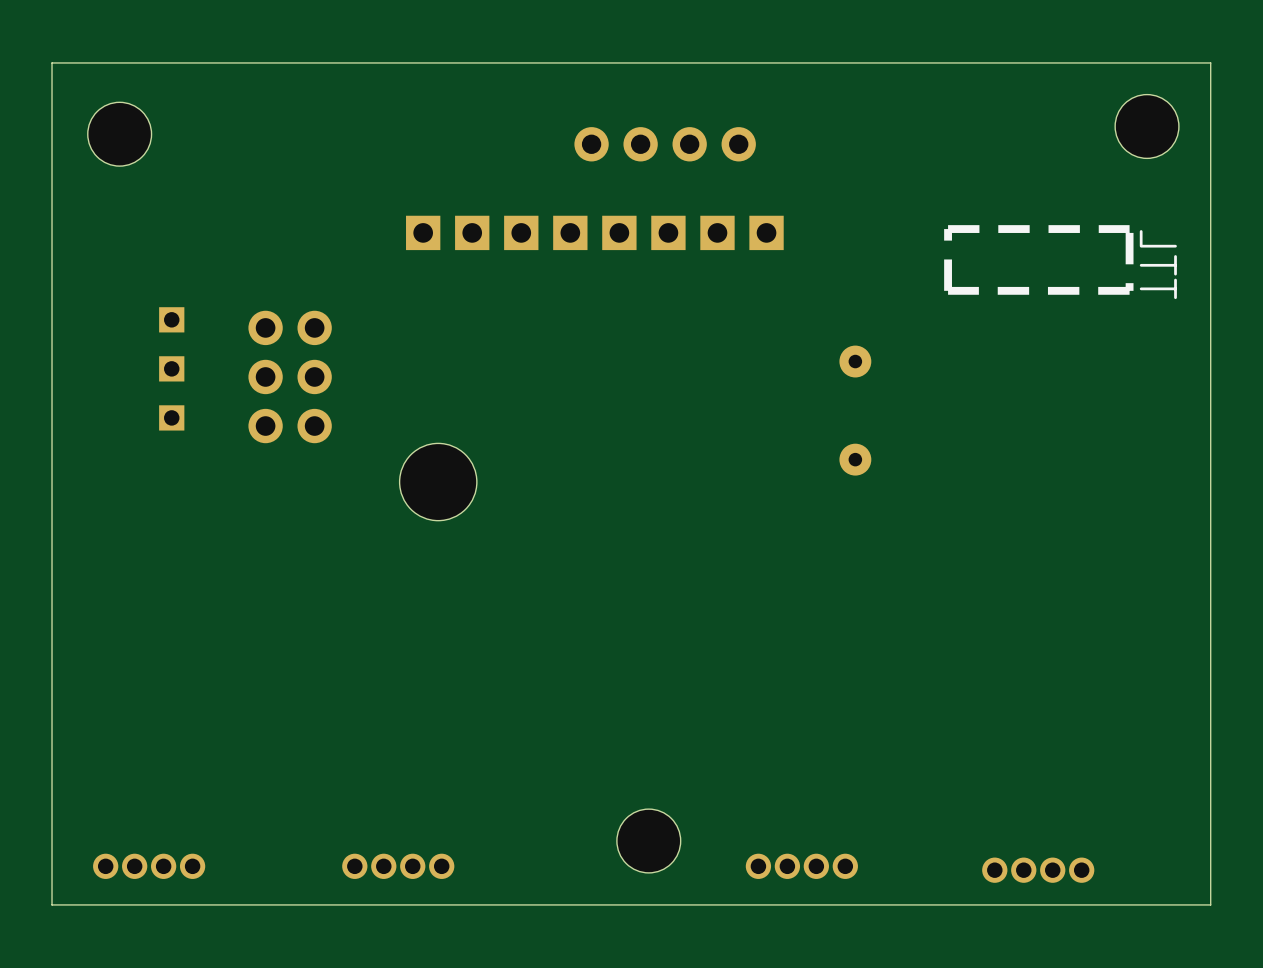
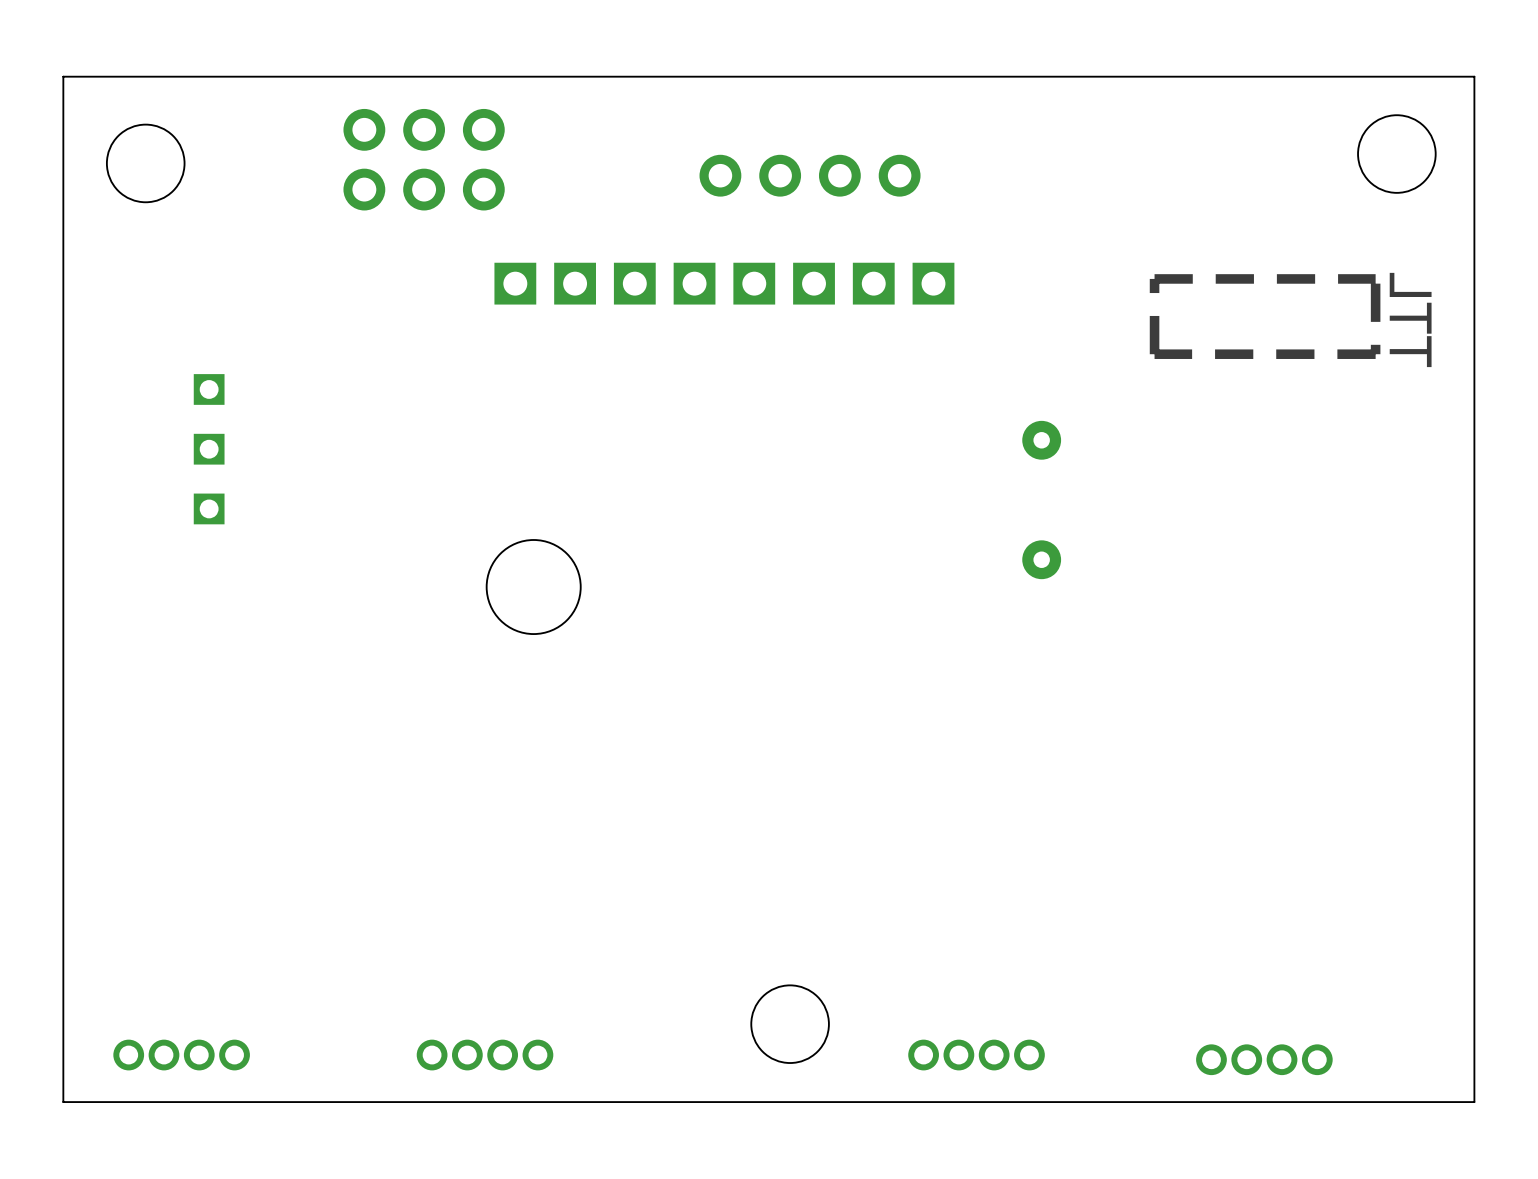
part rotation: 0° (290, 376) -> 90° clockwise (424, 159)
part position: (290, 376) -> (424, 159)

